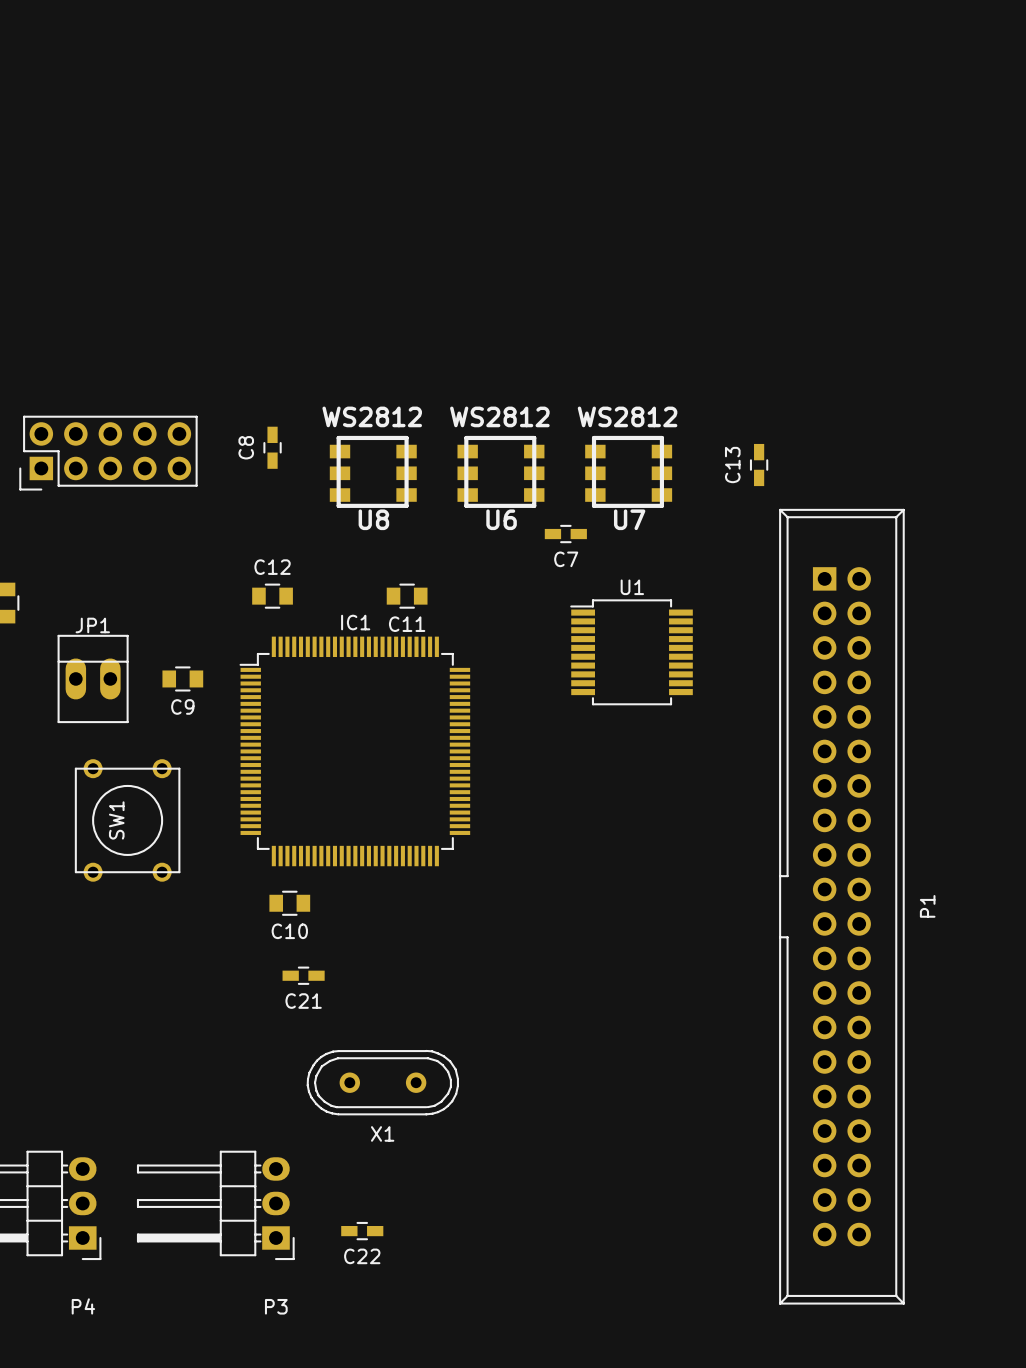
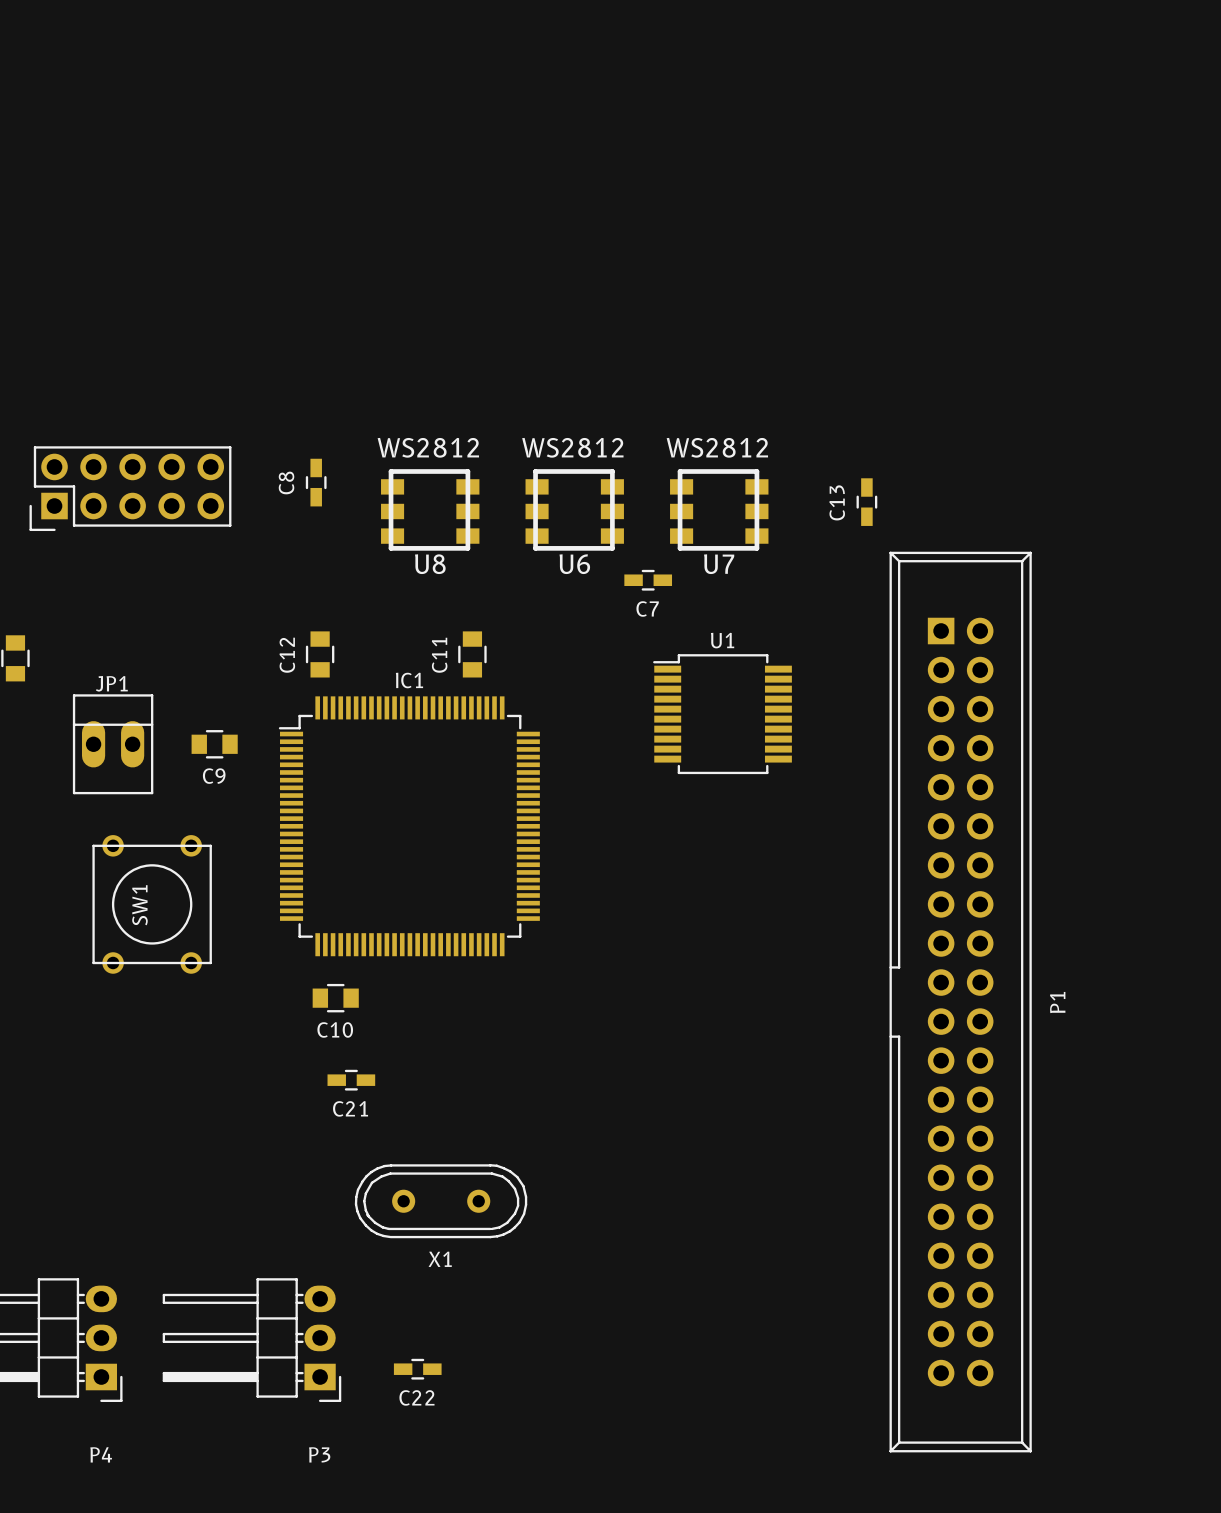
C12 name position: C12 (272, 567) -> C12 (287, 655)
C12 rotation: 0° (272, 596) -> 90° clockwise (320, 654)
C11 rotation: 0° (407, 596) -> 90° clockwise (472, 654)

